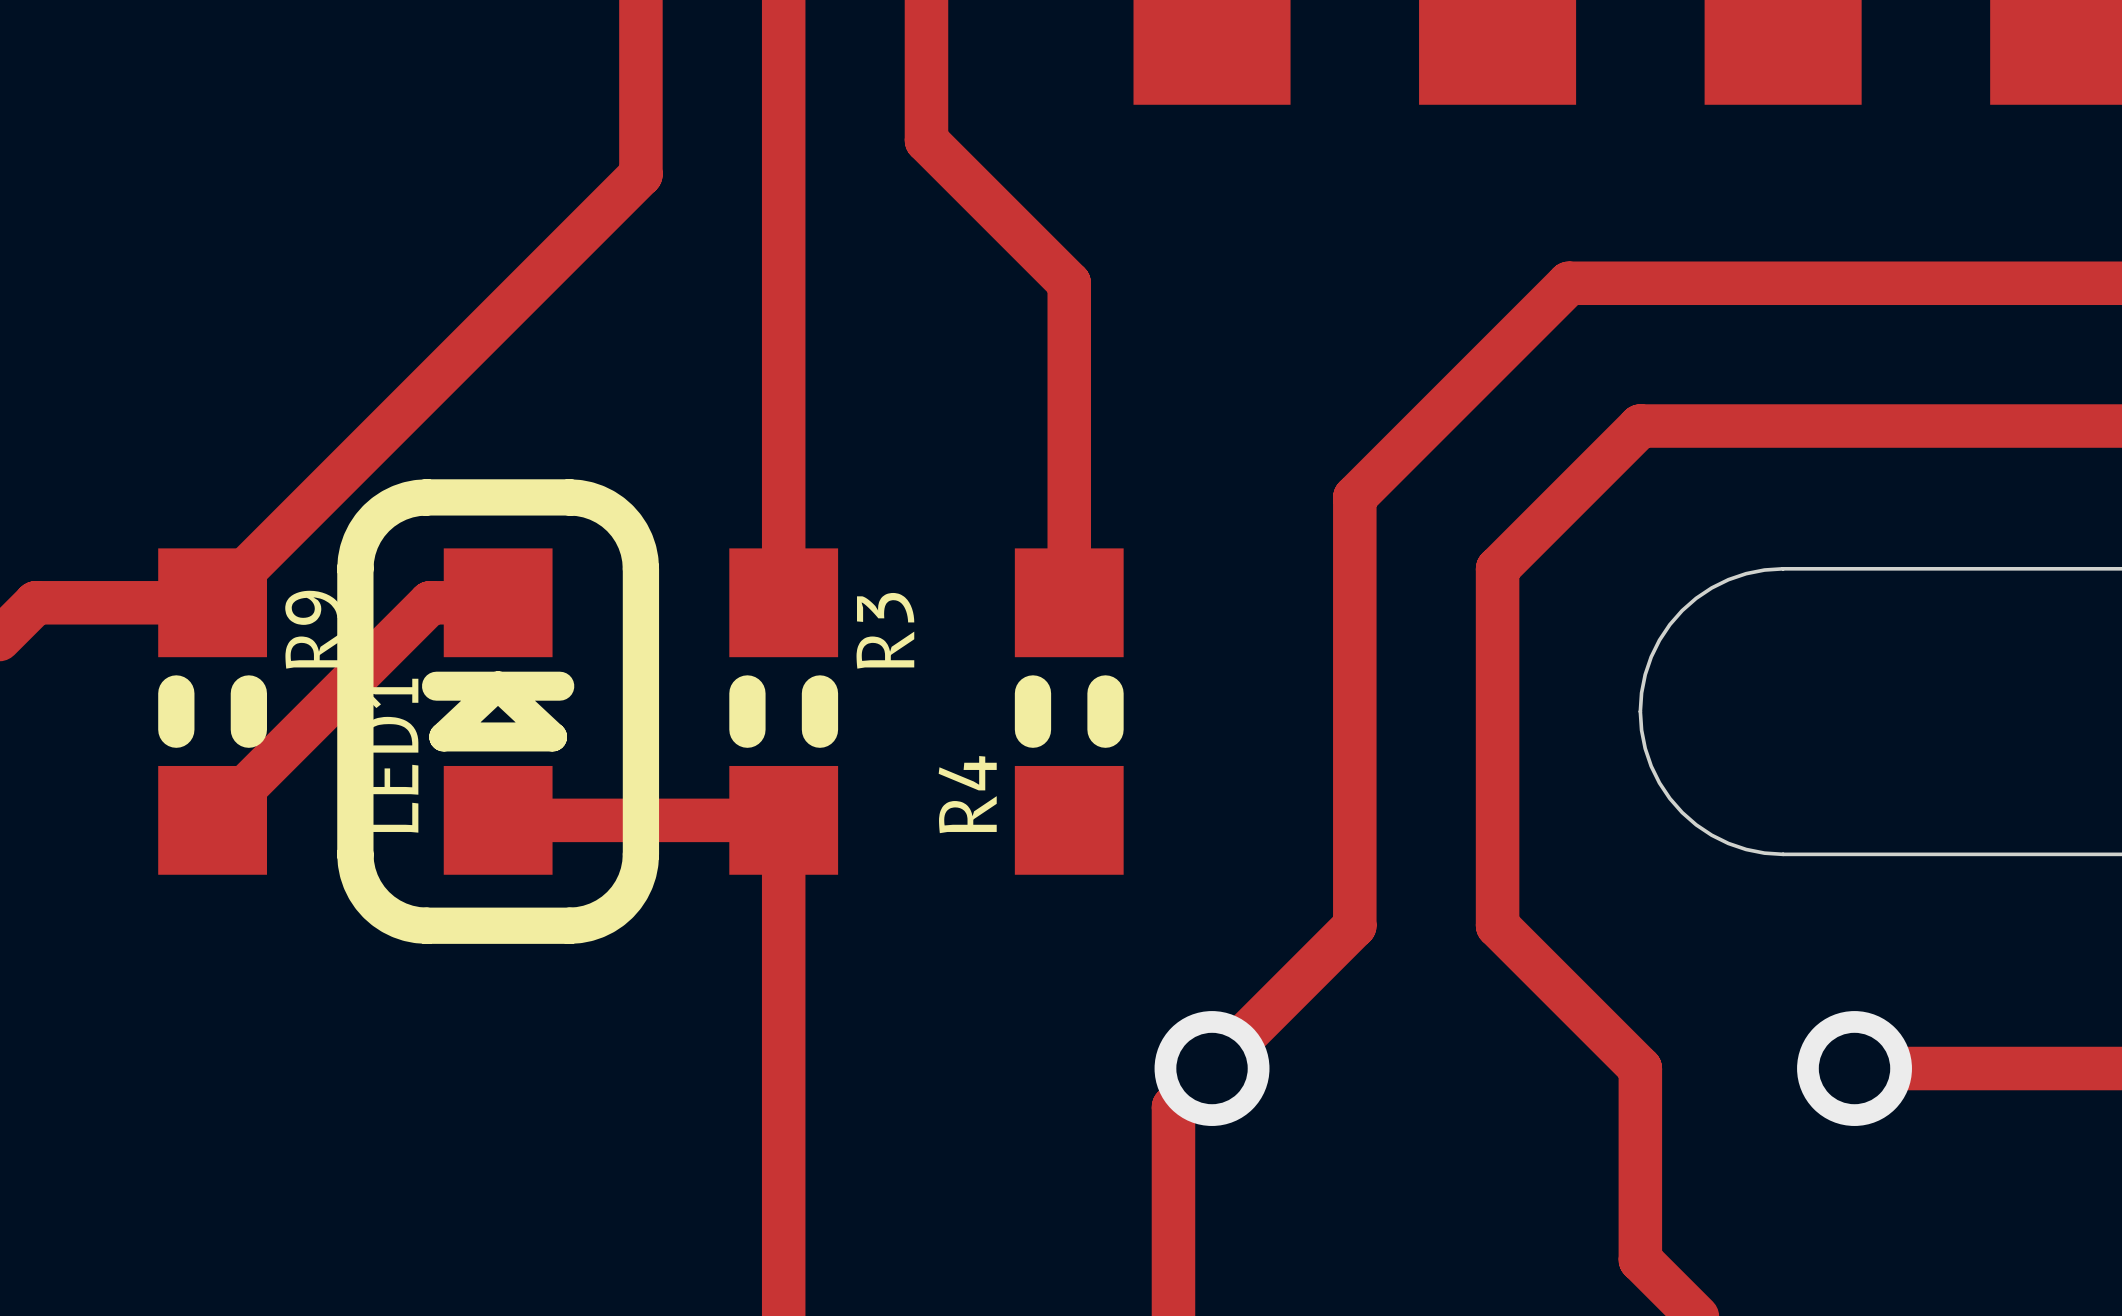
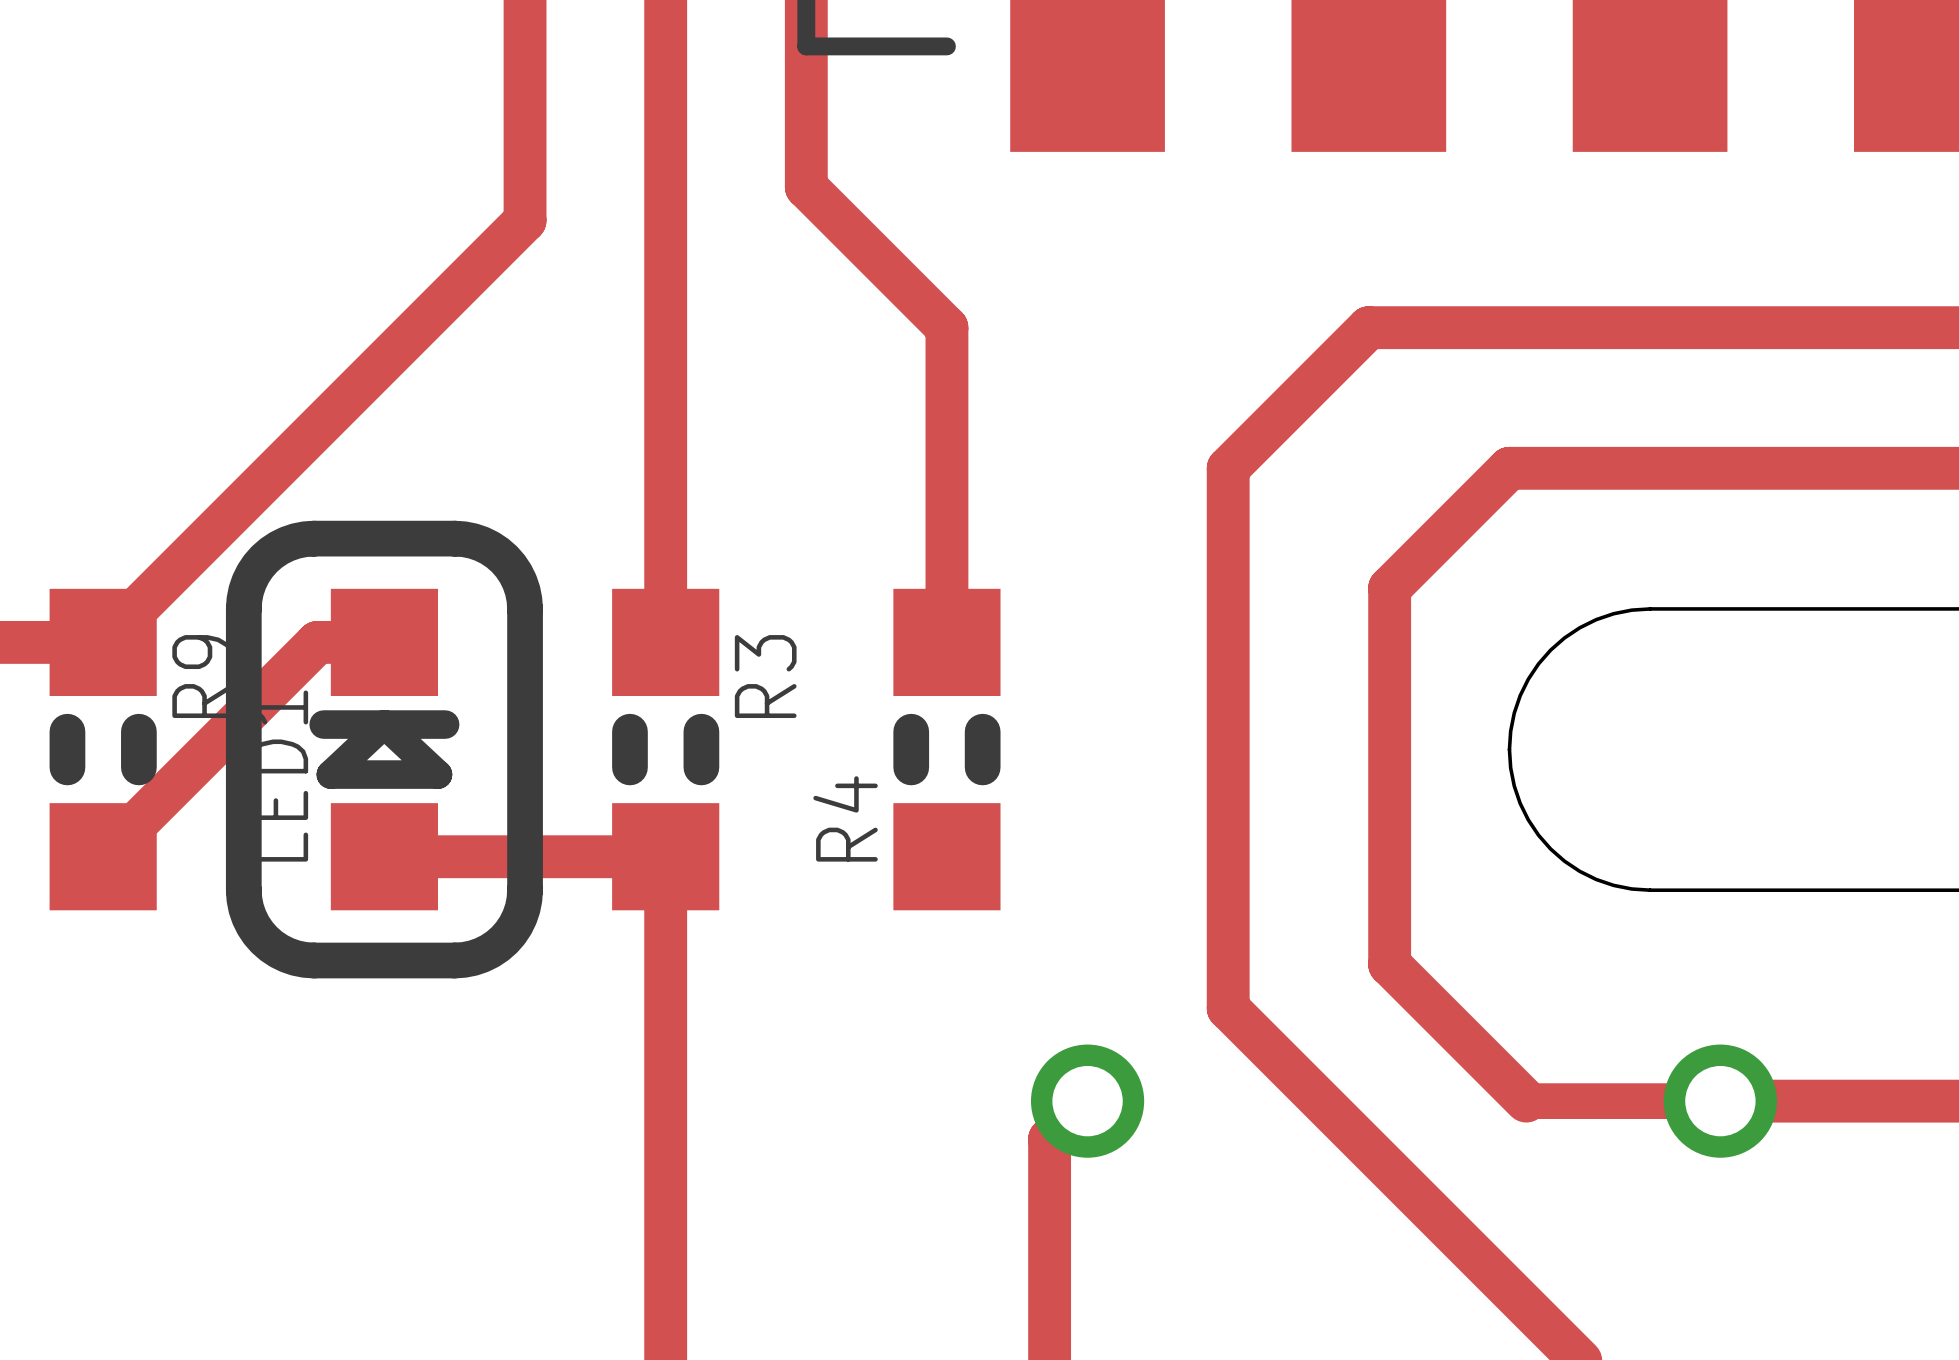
track: (1568, 283) (1354, 497) -> (1439, 327) (1368, 327) (1228, 468) (1228, 538)
track: (1518, 547) (1497, 568) (1497, 925) (1640, 1068) (1640, 1259) -> (1389, 588) (1389, 964) (1526, 1101) (1720, 1101)
track: (1354, 925) (1212, 1068) -> (1228, 960) (1228, 1008) (1509, 1289)

